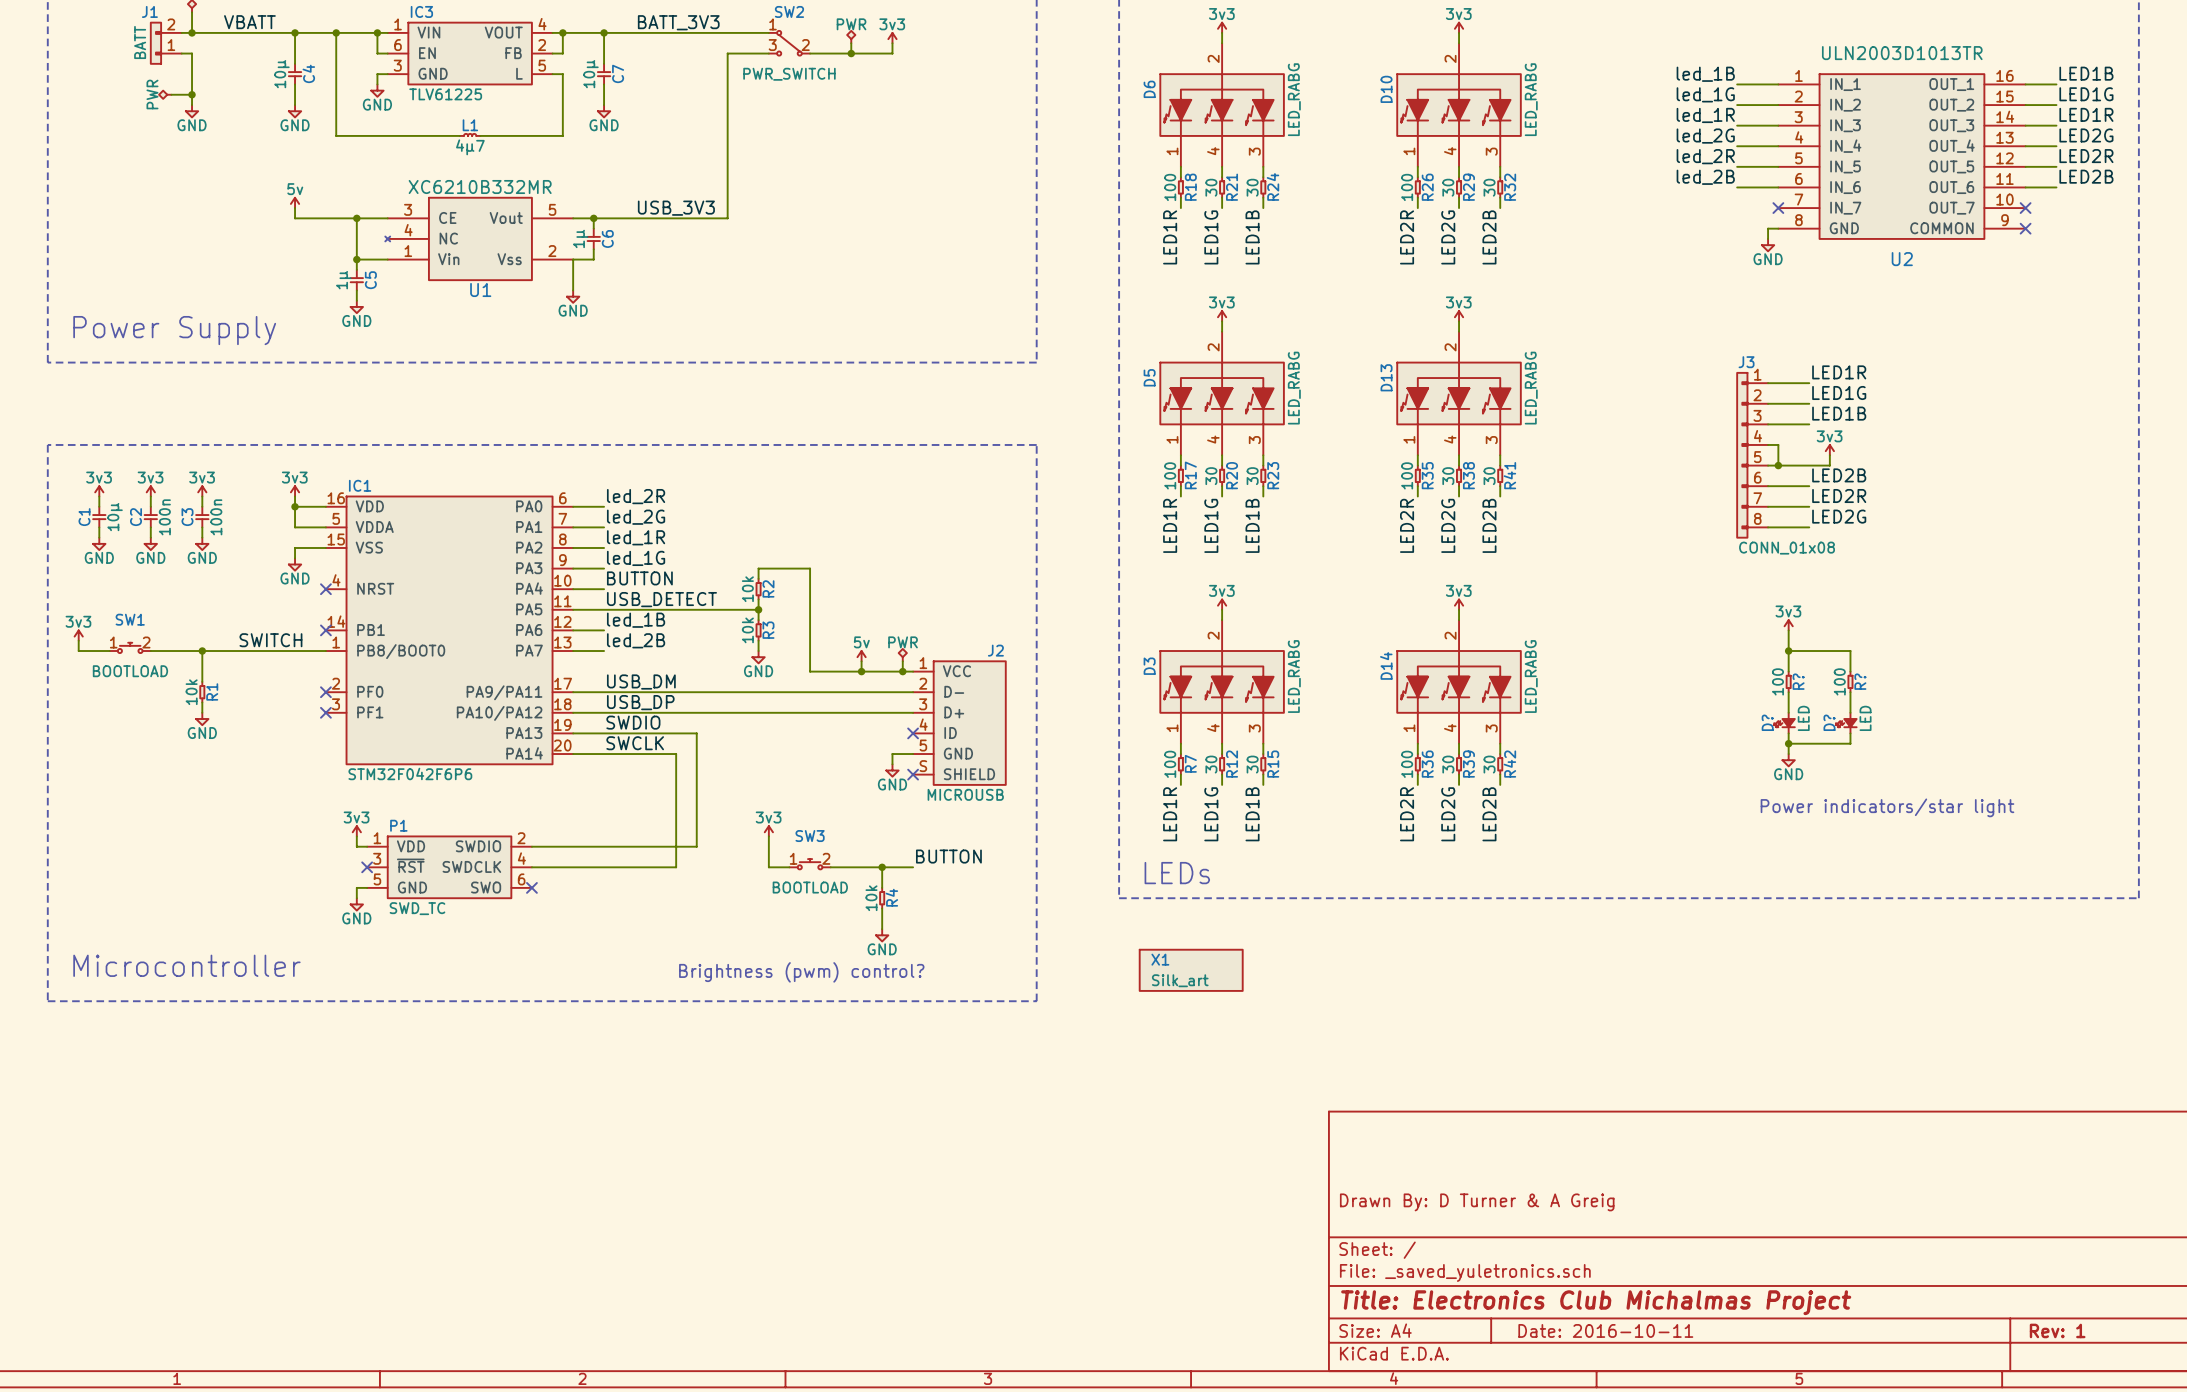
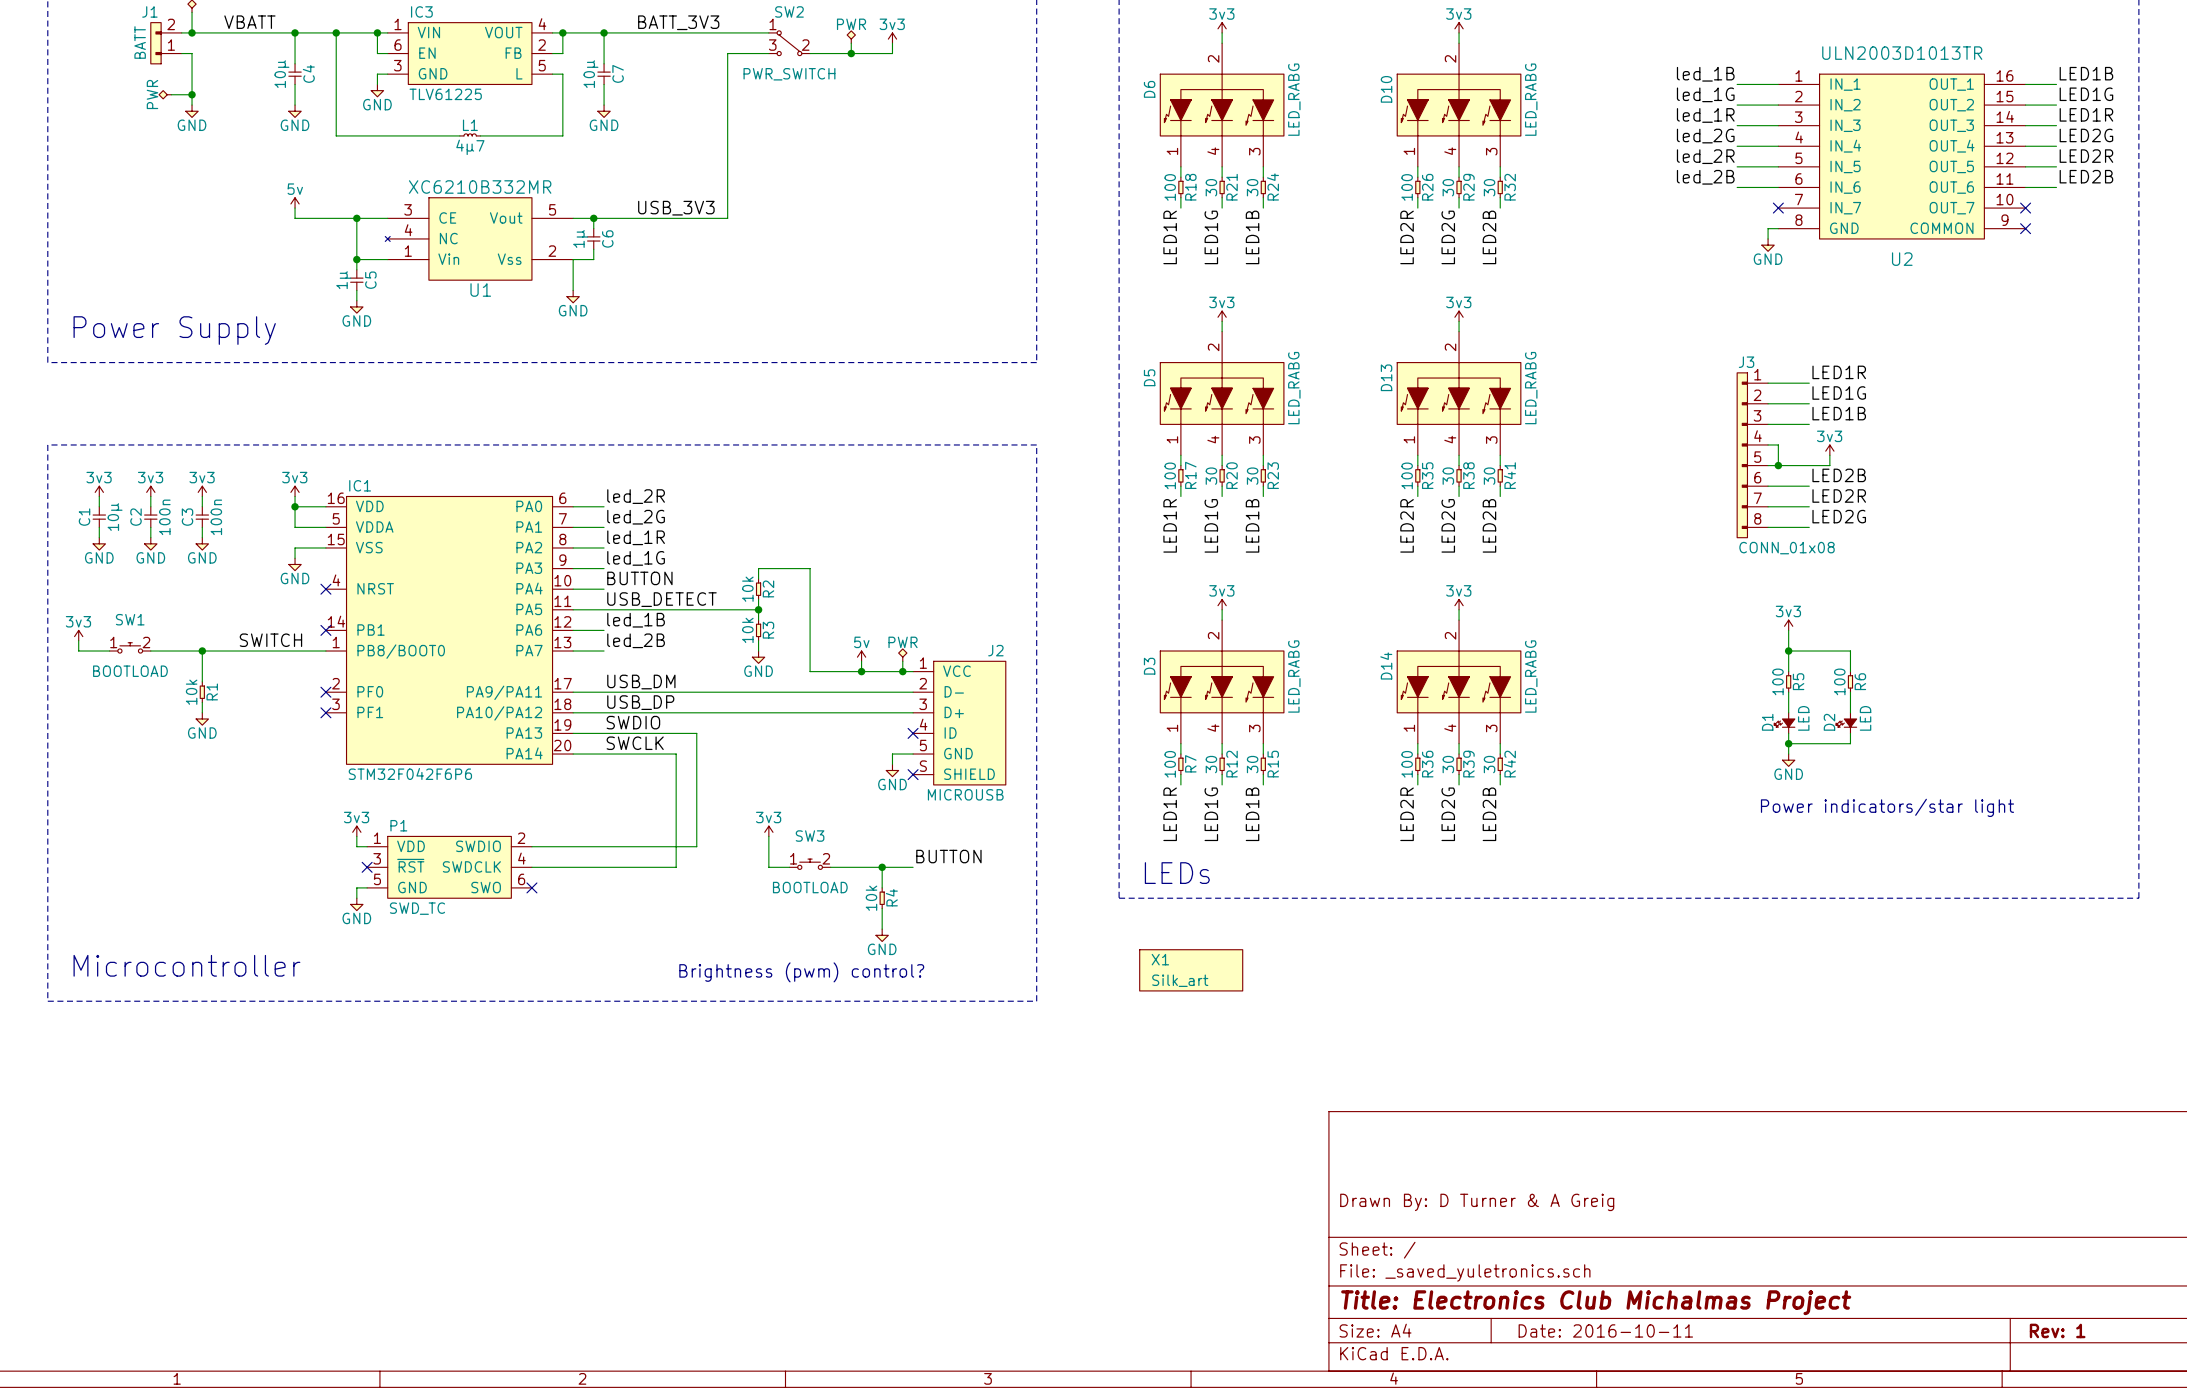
R? name: R? (1798, 681) -> R5 (1798, 681)
R? name: R? (1860, 681) -> R6 (1860, 681)
D? name: D? (1767, 722) -> D1 (1767, 722)
D? name: D? (1829, 722) -> D2 (1829, 722)

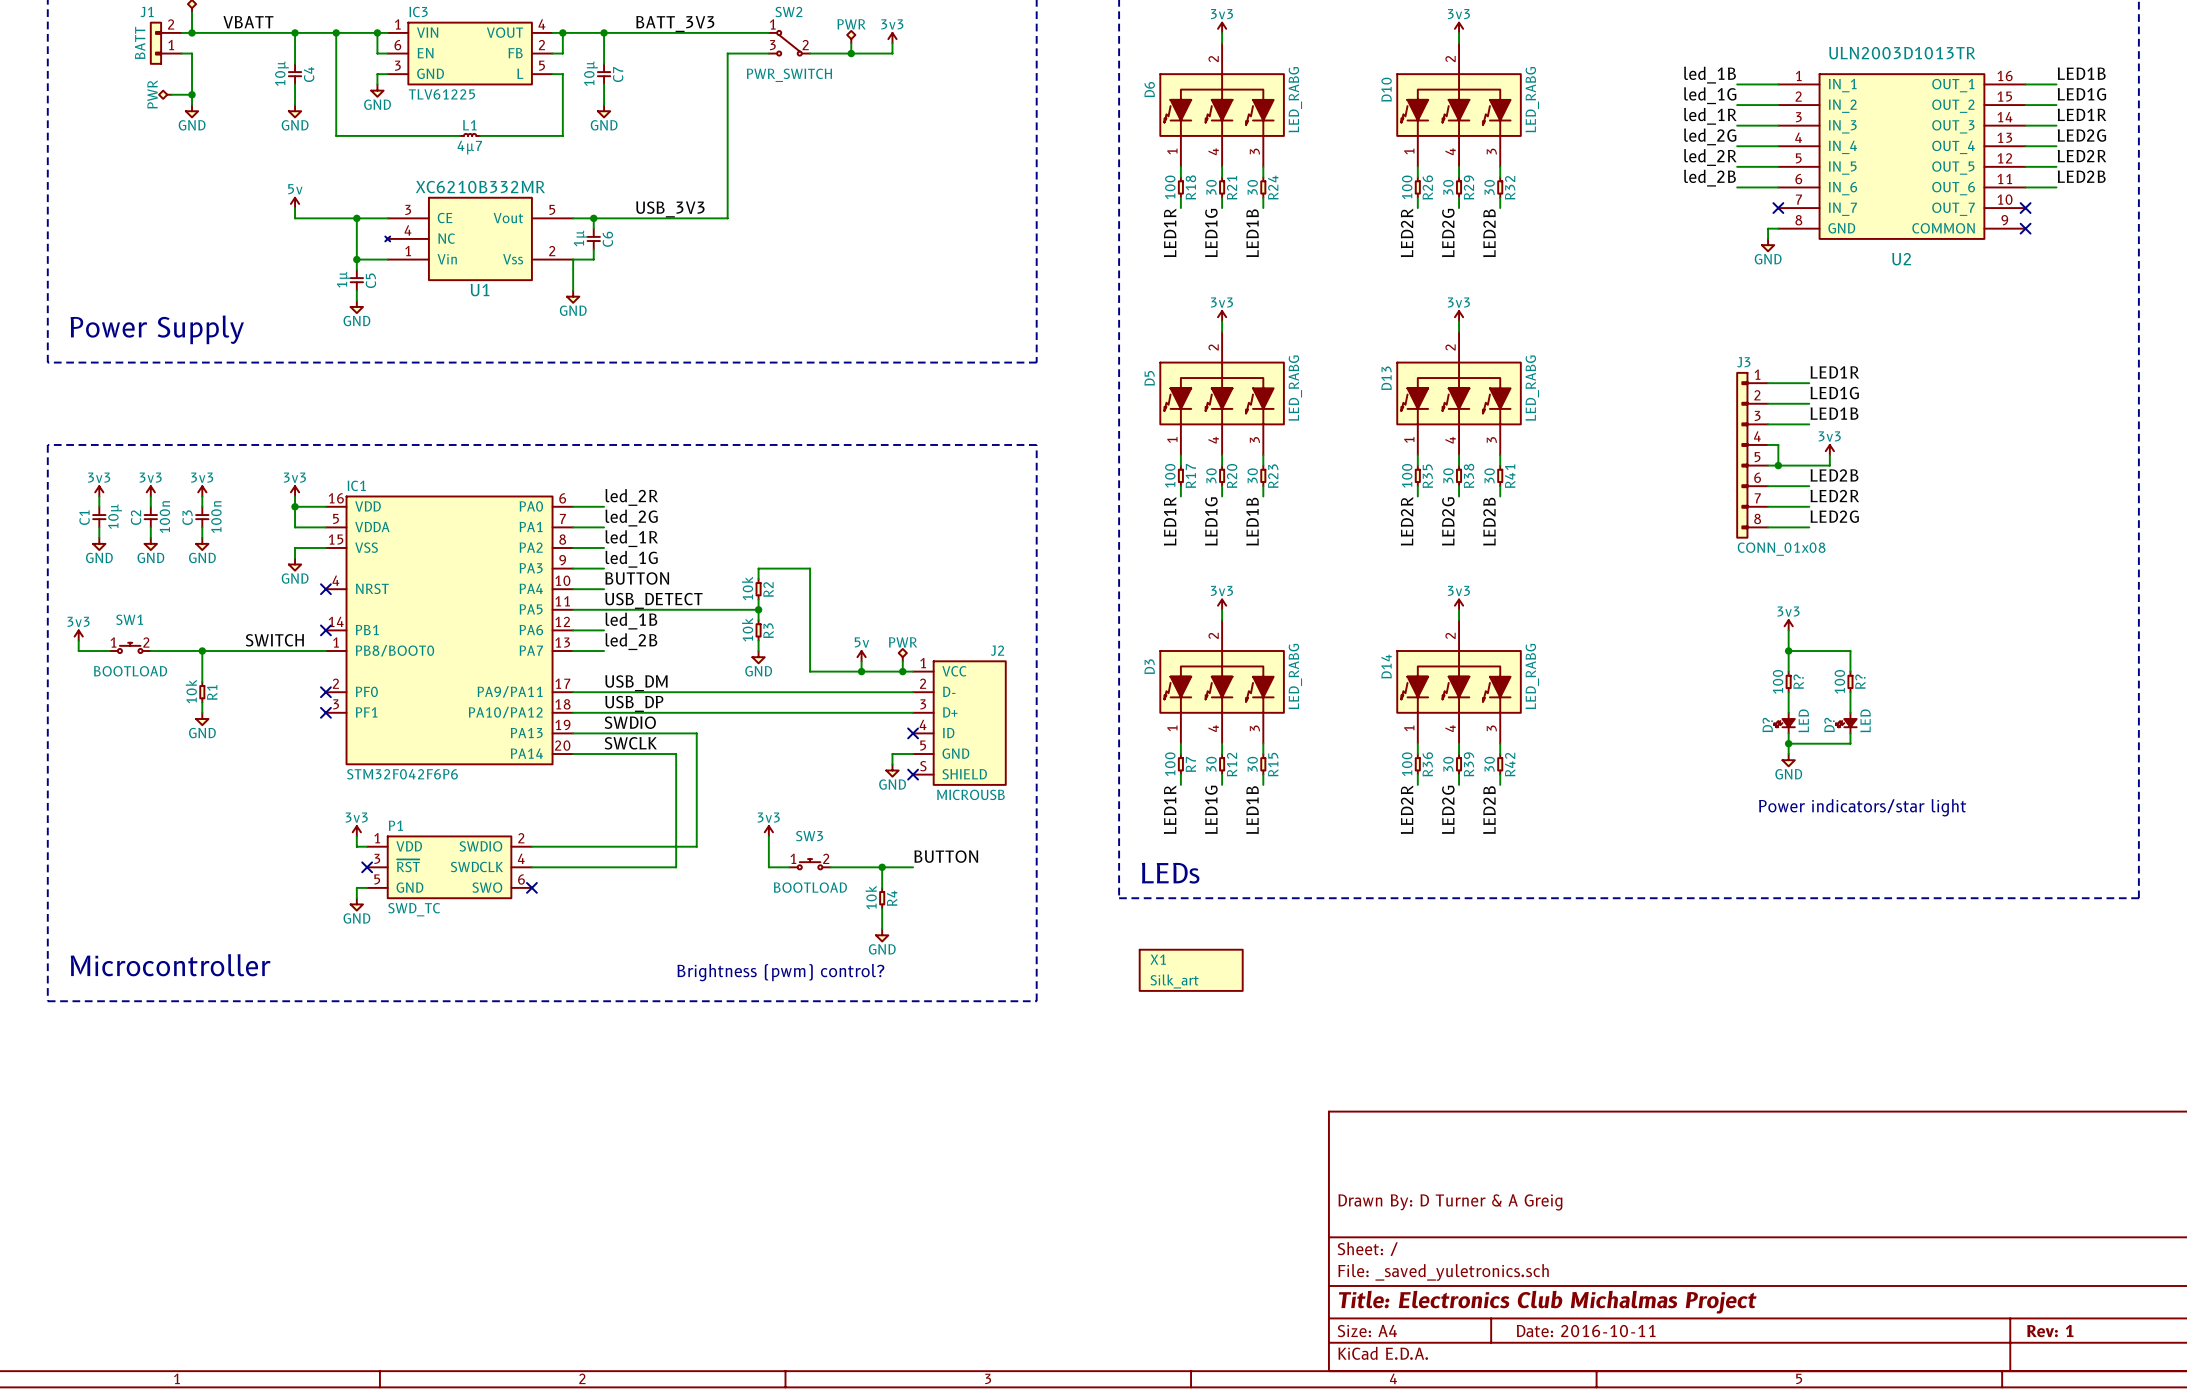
R5 name: R5 (1798, 681) -> R? (1798, 681)
R6 name: R6 (1860, 681) -> R? (1860, 681)
D1 name: D1 (1767, 722) -> D? (1767, 725)
D2 name: D2 (1829, 722) -> D? (1829, 725)

